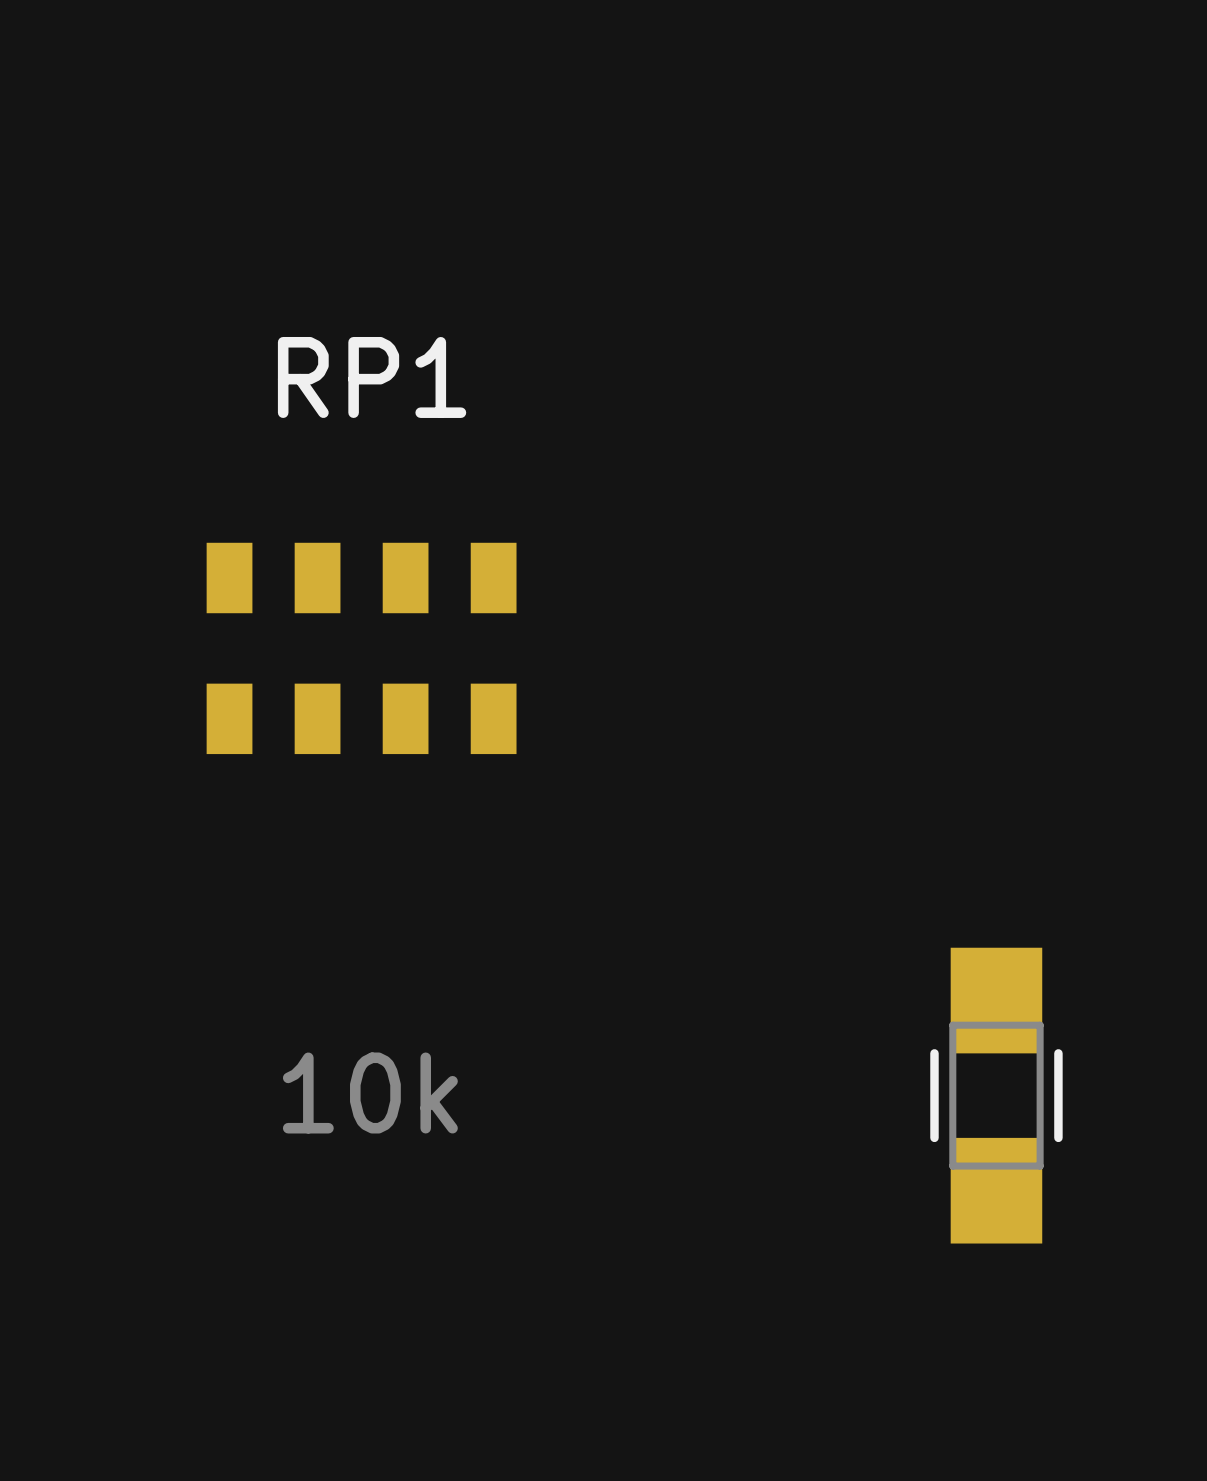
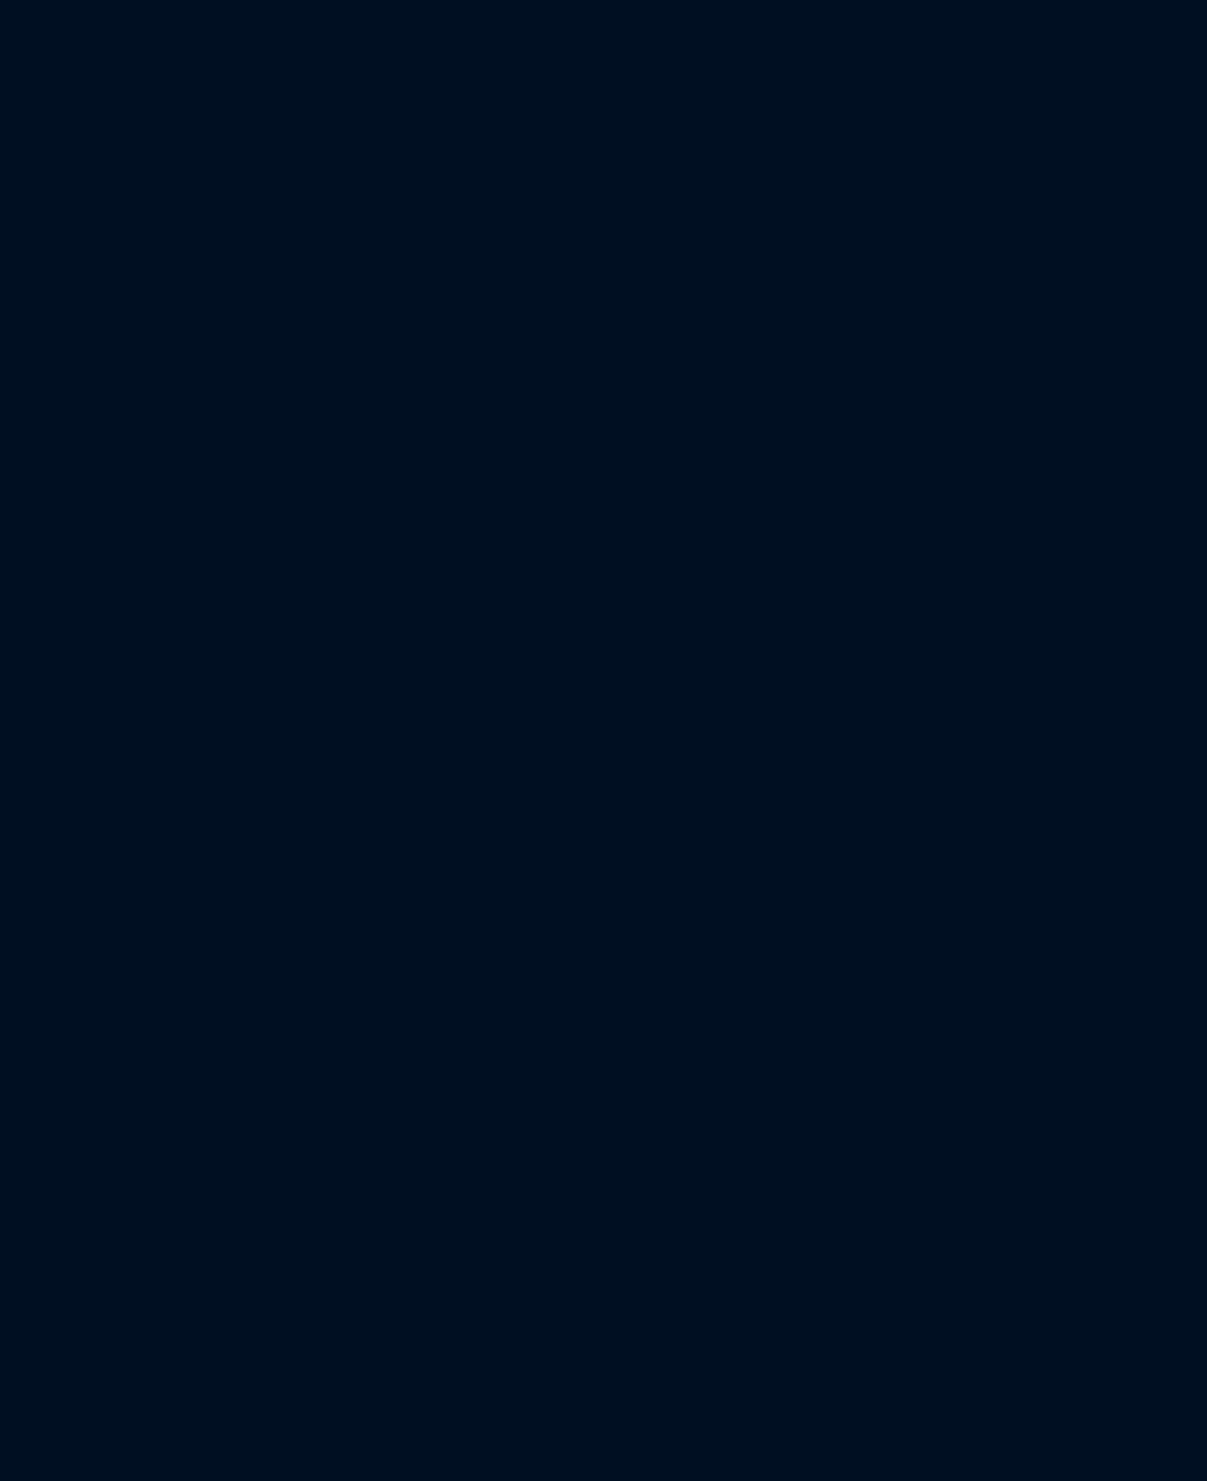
RP1: 10k (361, 648) -> none
part: (996, 1095) -> none

